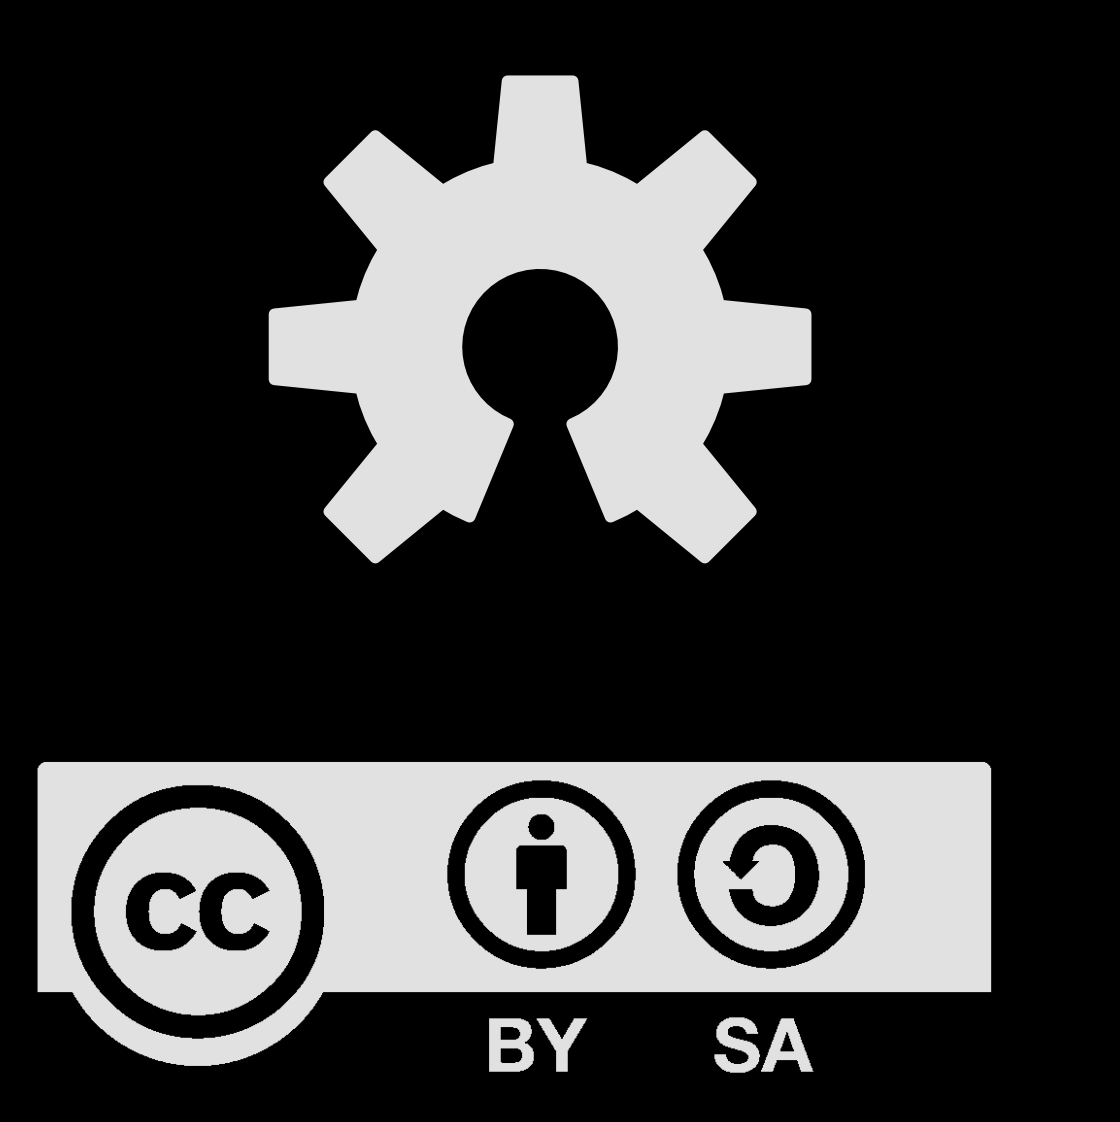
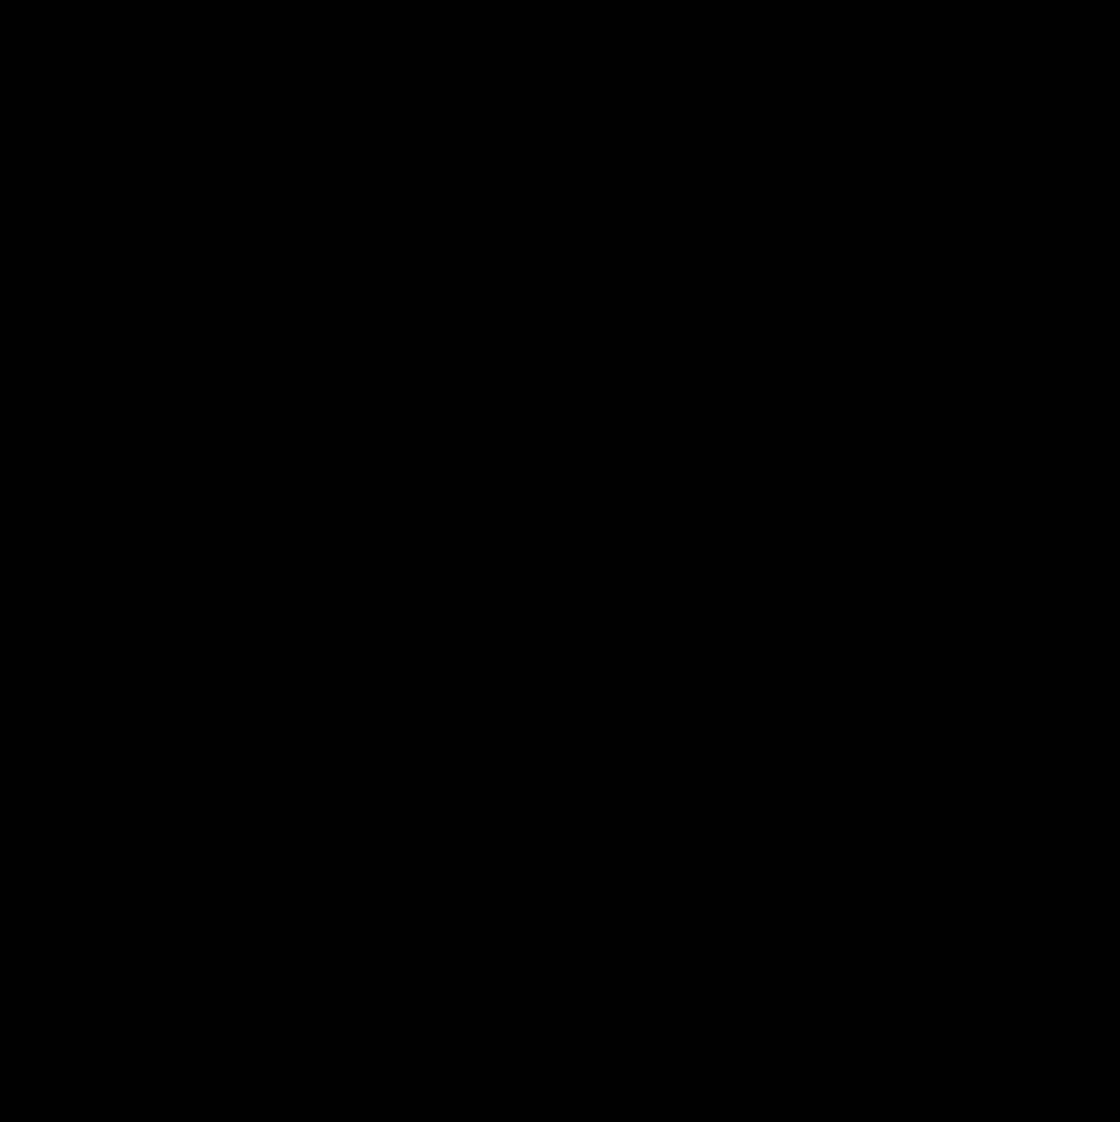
drawing: [268, 75, 812, 564] -> none
drawing: [37, 761, 992, 1073] -> none

